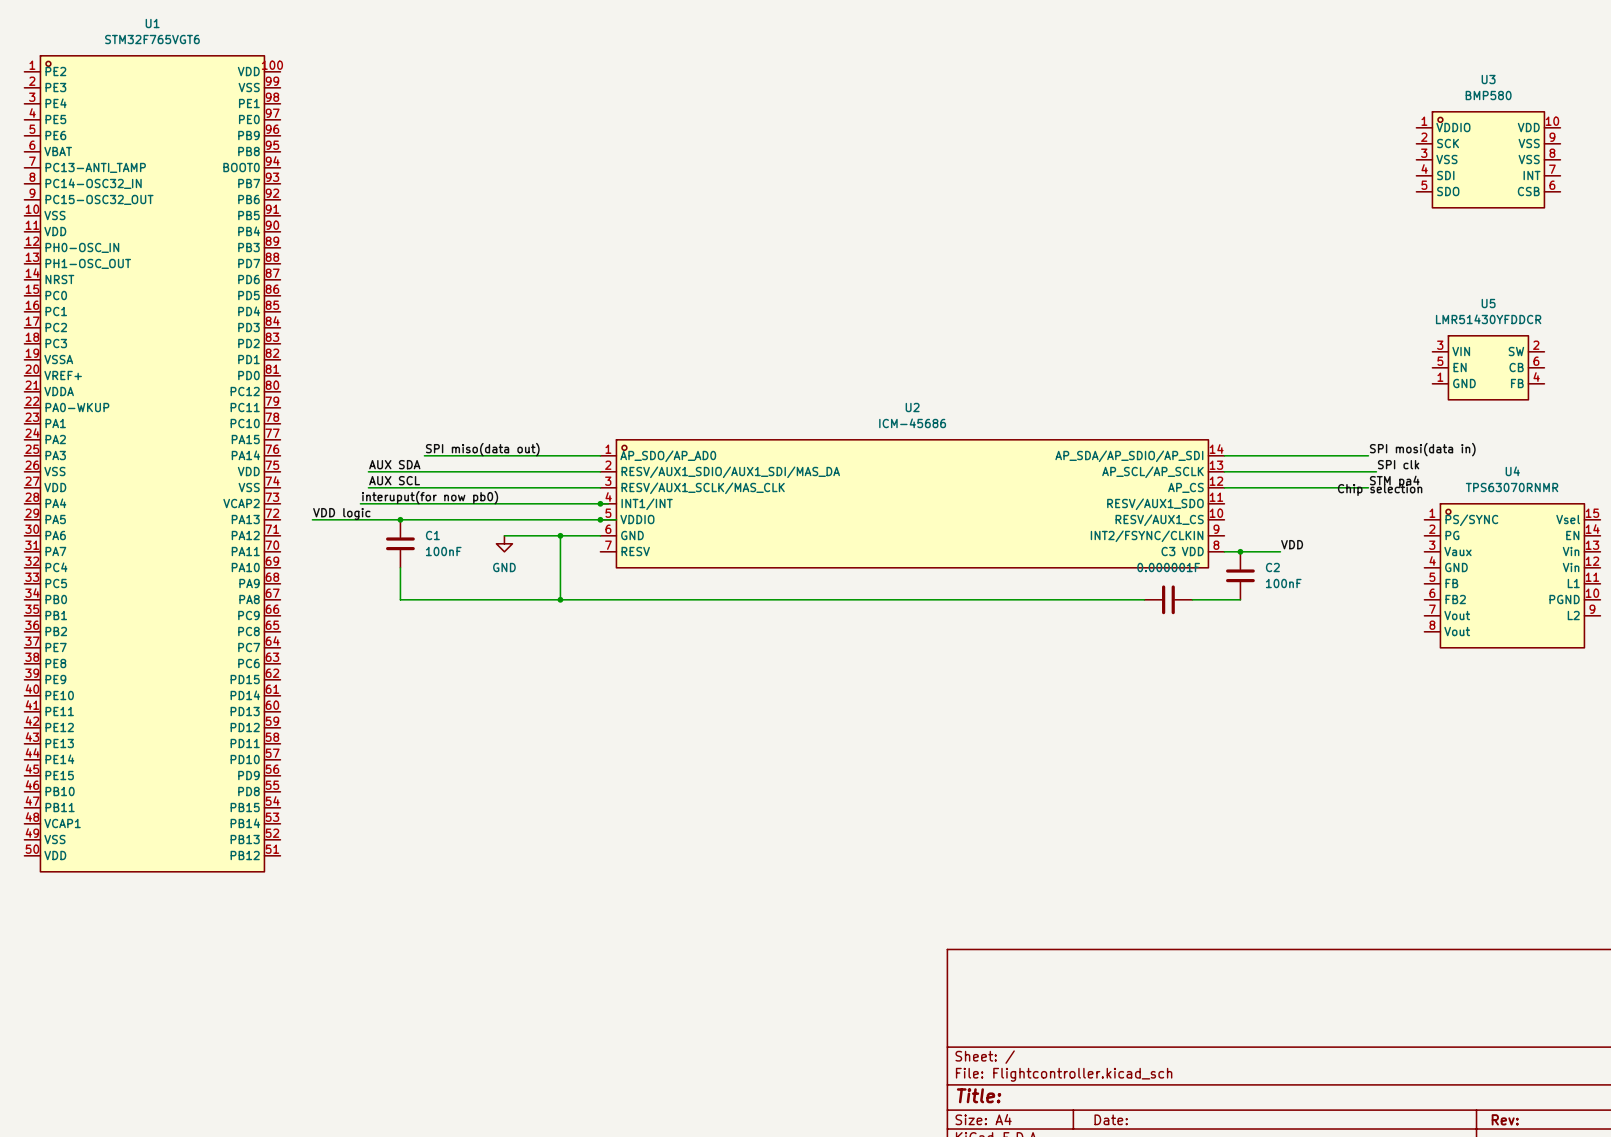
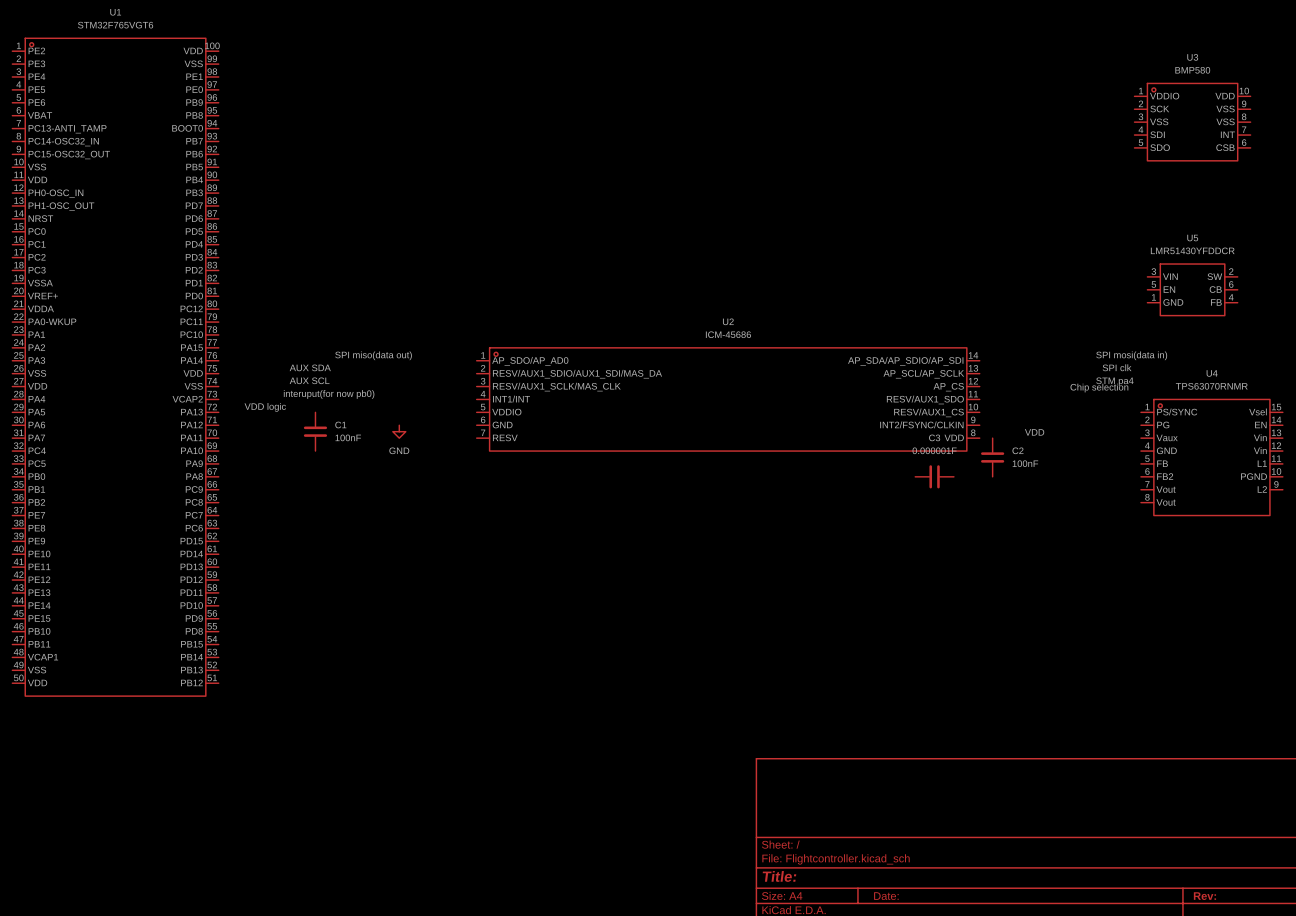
wire: (424, 455) (600, 455) -> none
wire: (1224, 455) (1368, 455) -> none
wire: (368, 471) (600, 471) -> none
wire: (1224, 471) (1376, 471) -> none
wire: (368, 487) (600, 487) -> none
wire: (1224, 487) (1368, 487) -> none
wire: (360, 503) (608, 503) -> none
junction: (600, 503) -> none
wire: (312, 519) (616, 519) -> none
junction: (400, 519) -> none
junction: (600, 519) -> none
wire: (504, 535) (600, 535) -> none
wire: (560, 535) (560, 599) -> none
junction: (560, 535) -> none
wire: (1224, 551) (1280, 551) -> none
junction: (1240, 551) -> none
wire: (400, 567) (400, 599) (1144, 599) -> none
junction: (560, 599) -> none
wire: (1192, 599) (1240, 599) -> none

